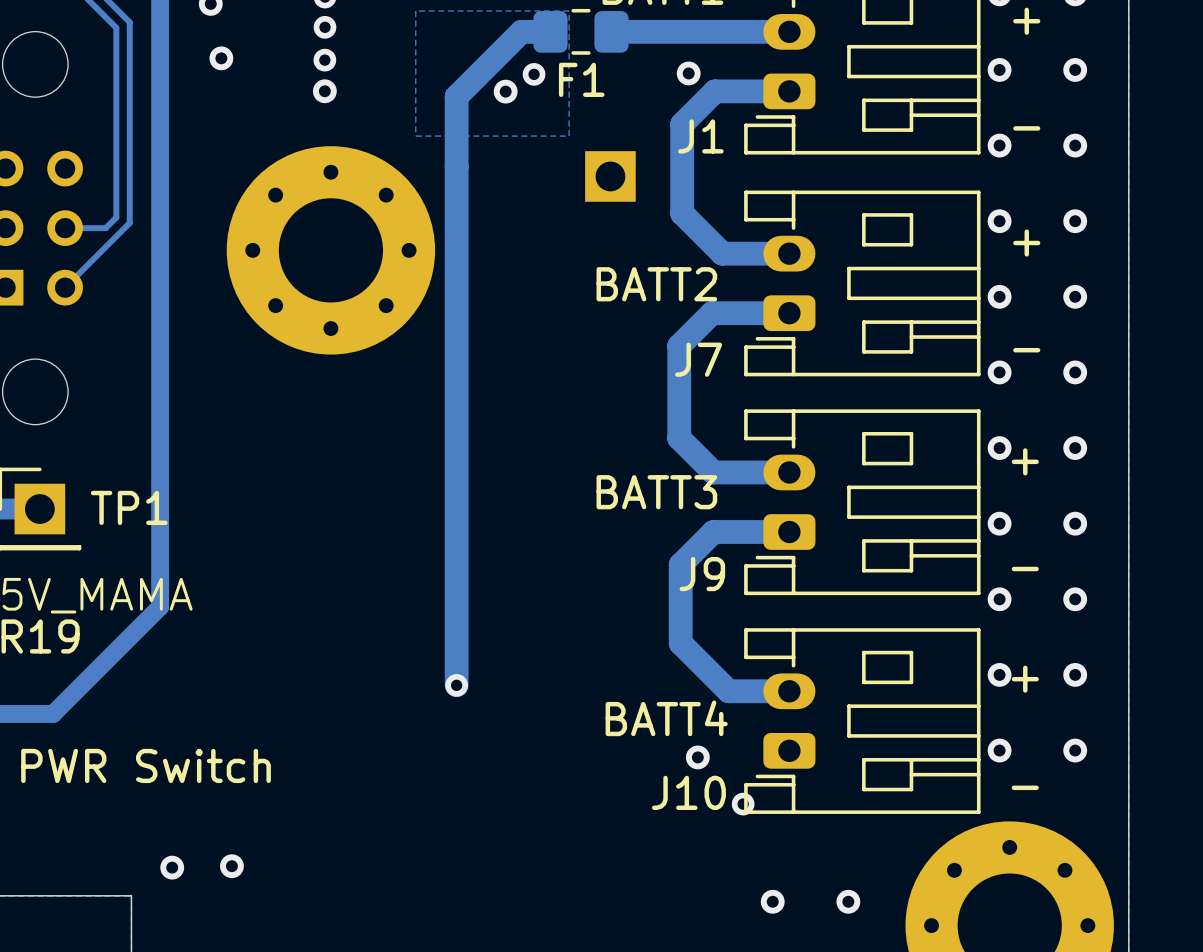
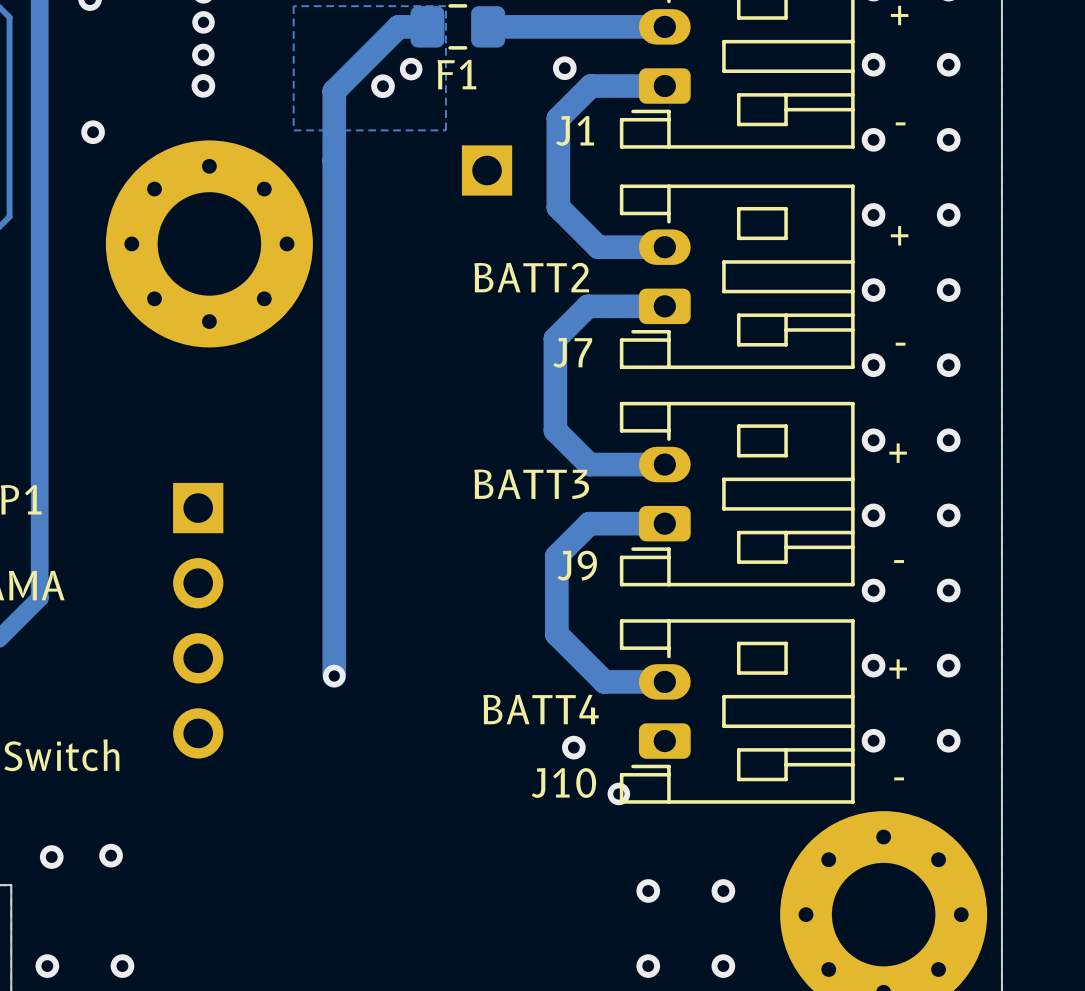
via position: (221, 58) -> (93, 132)
part: none -> (198, 620)

